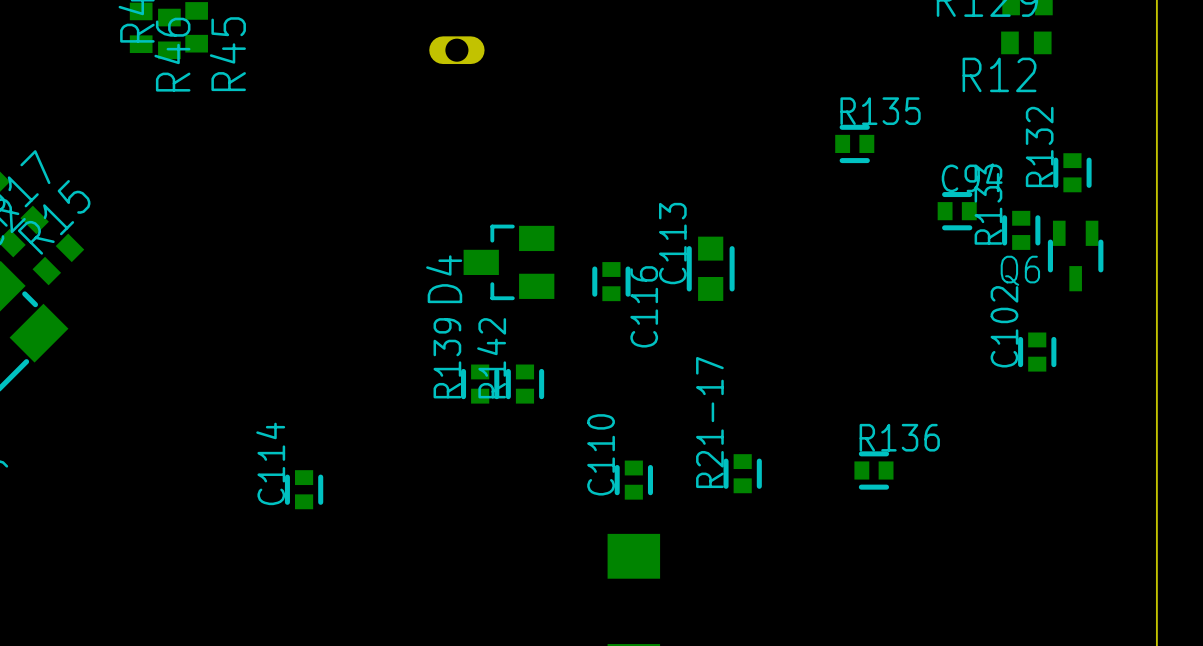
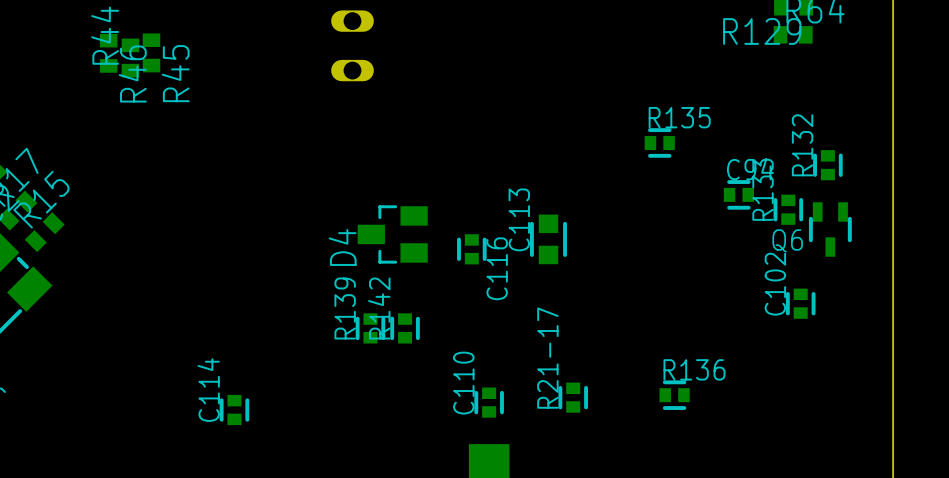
R12: (1026, 42) -> none

